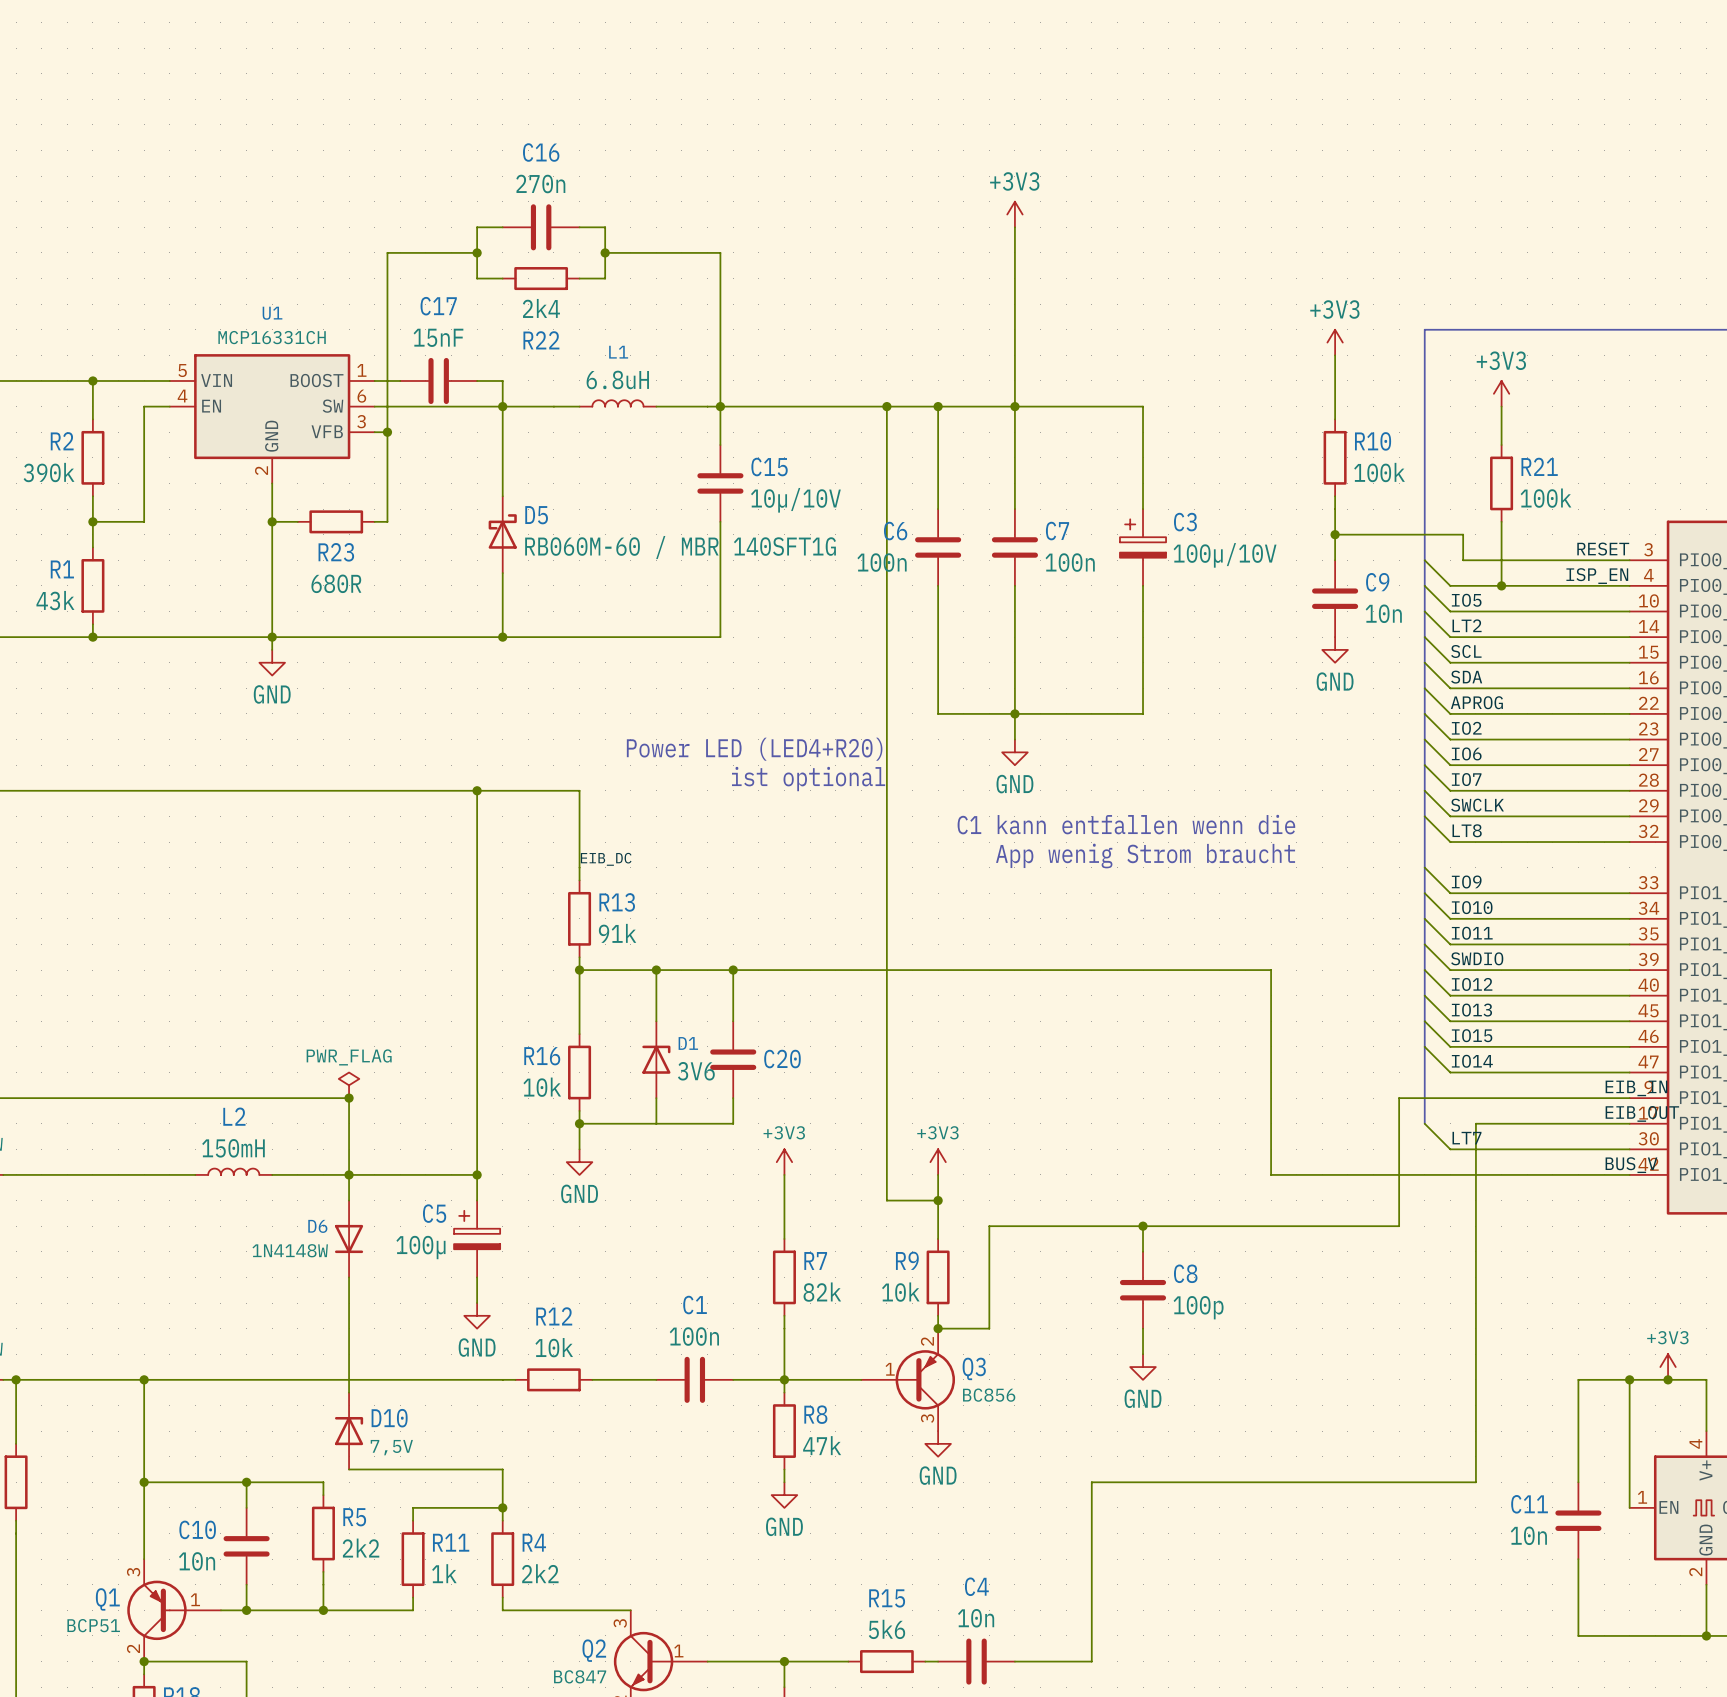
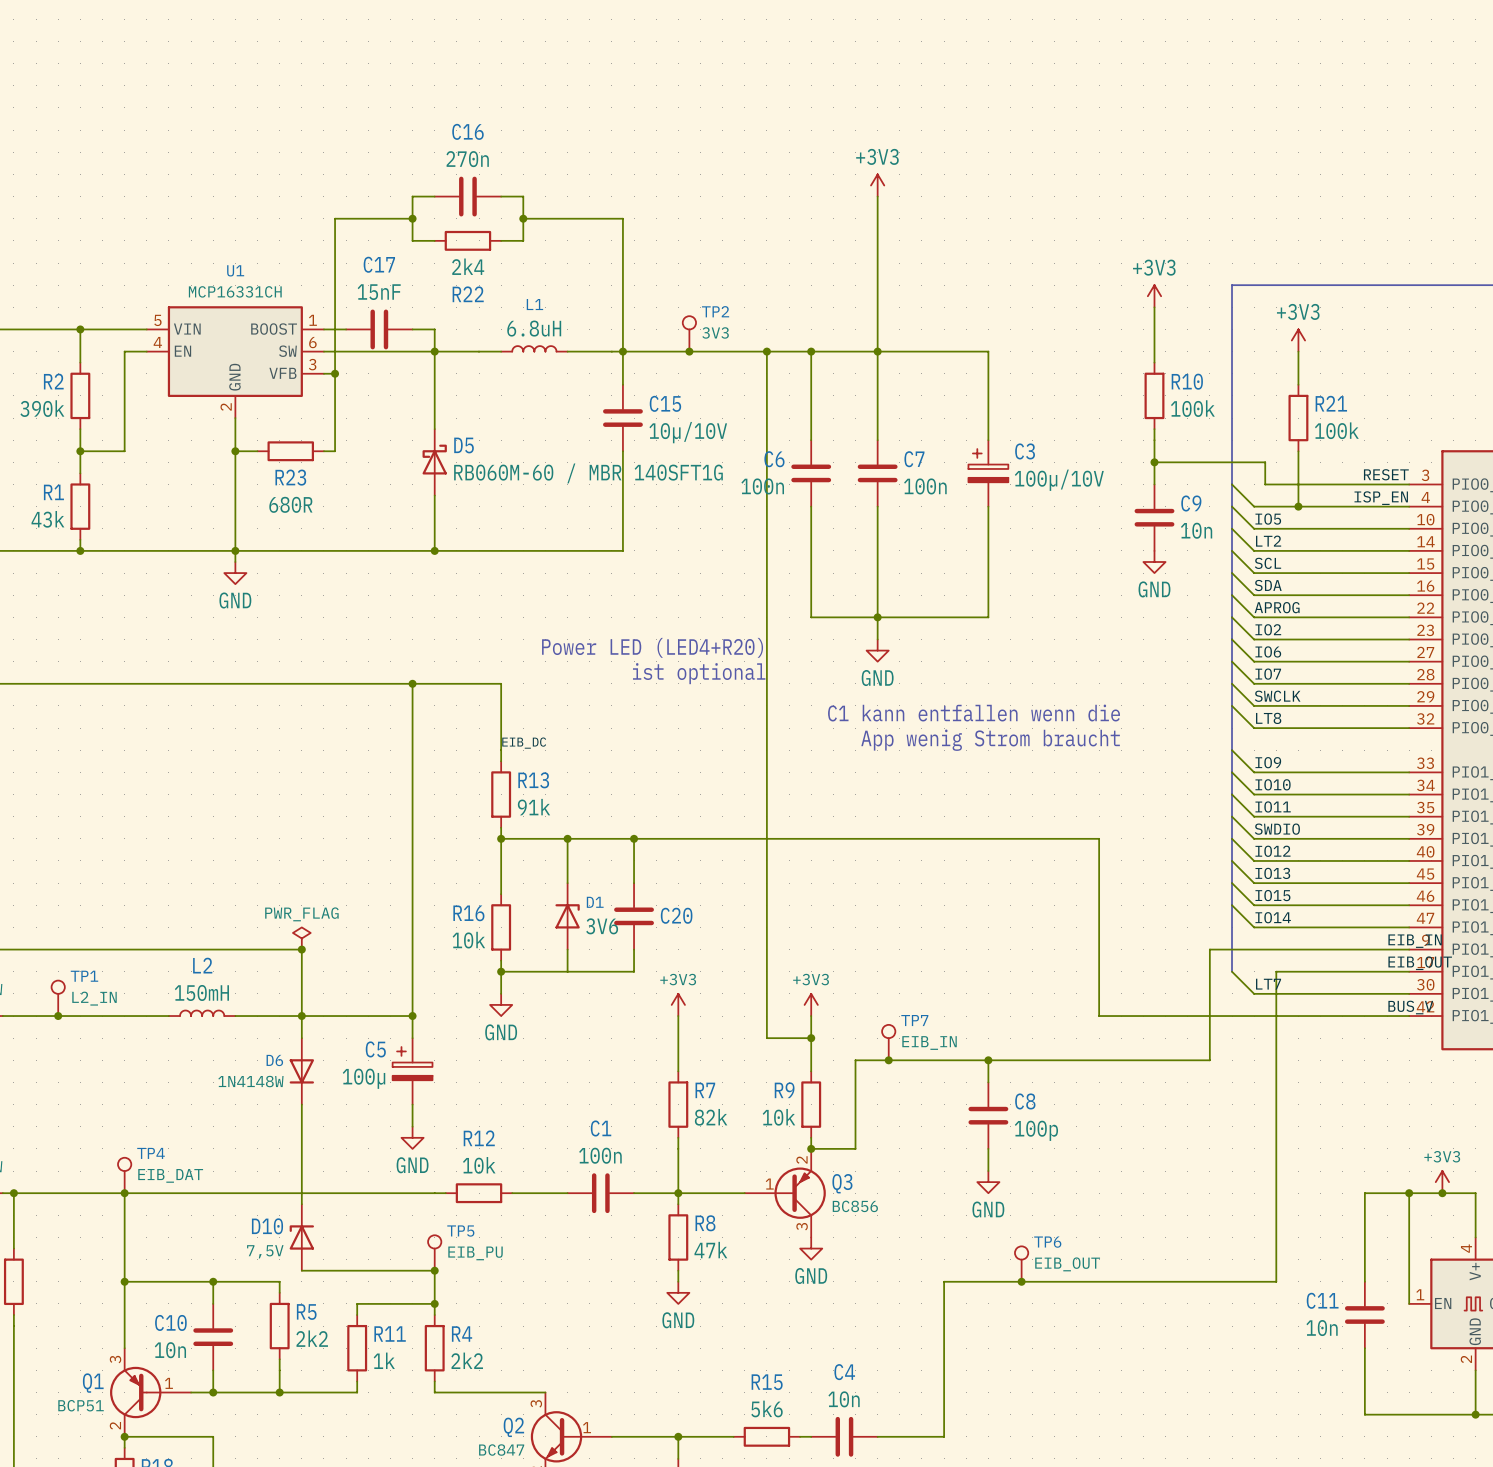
TP2: none -> 3V3 (689, 333)
junction: none -> (689, 351)
TP1: none -> L2_IN (58, 998)
junction: none -> (58, 1016)
TP7: none -> EIB_IN (888, 1042)
junction: none -> (888, 1060)
TP4: none -> EIB_DAT (124, 1175)
D10 flip: as is (349, 1431) -> left-right (301, 1237)
TP5: none -> EIB_PU (434, 1252)
TP6: none -> EIB_OUT (1021, 1264)
junction: none -> (434, 1270)
junction: none -> (1021, 1281)

